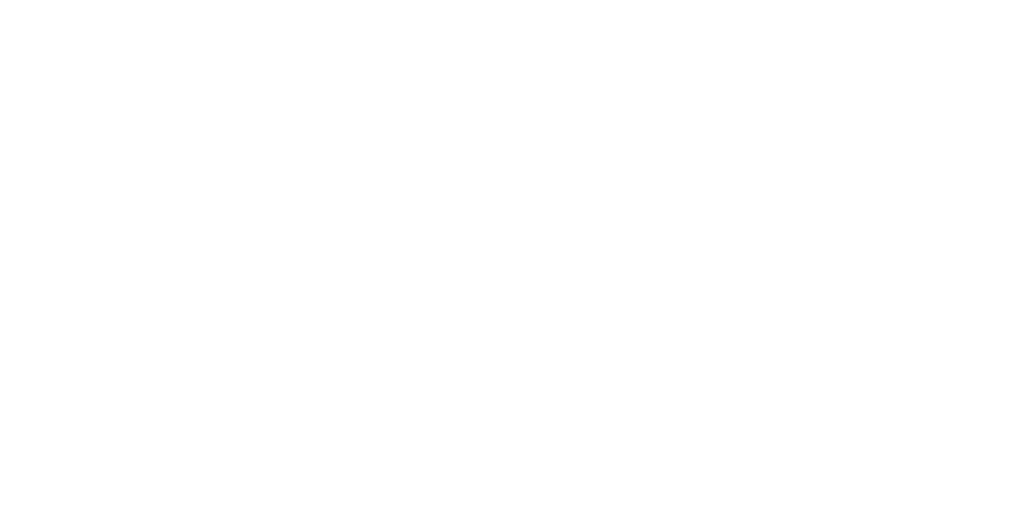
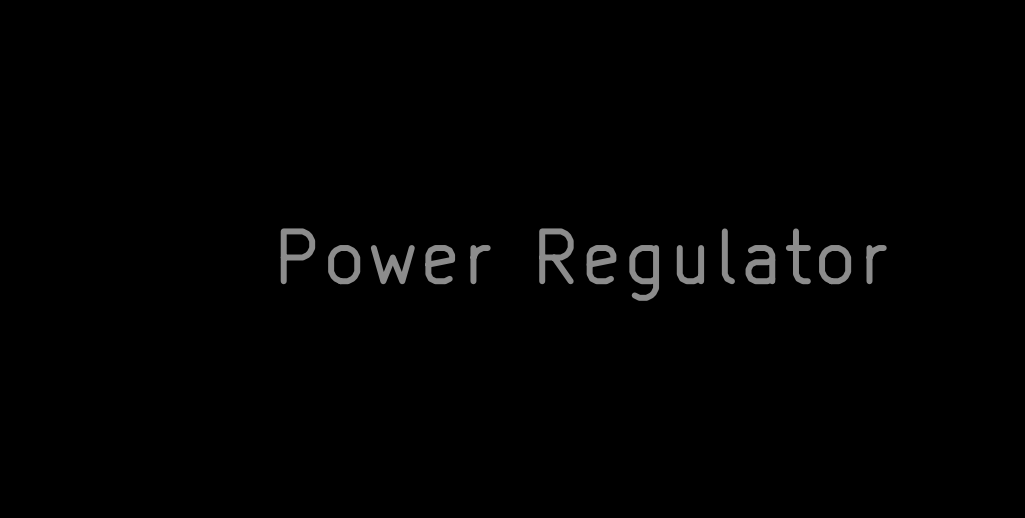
text: none -> Power Regulator (583, 264)

